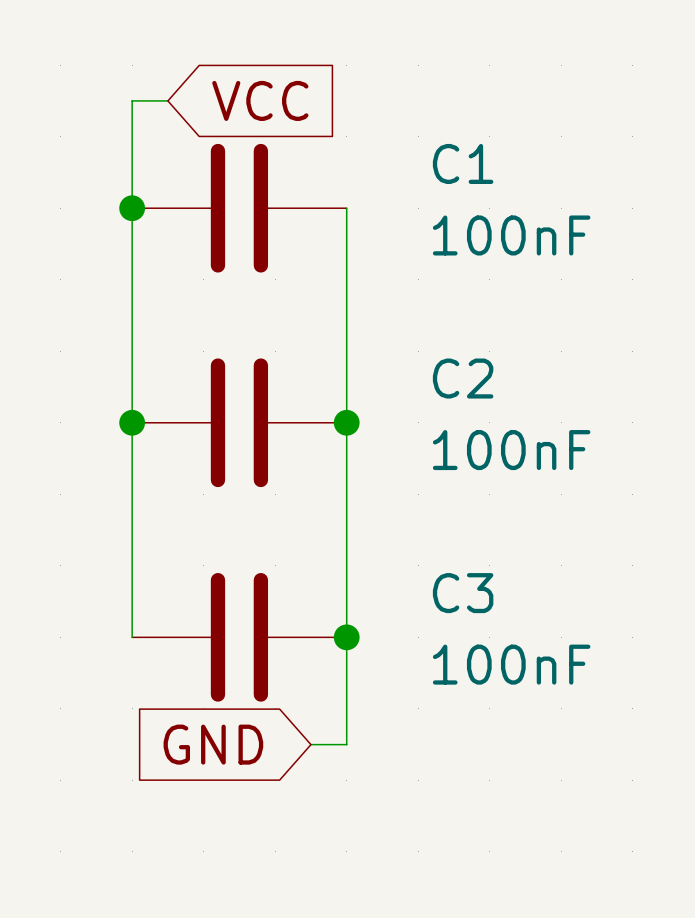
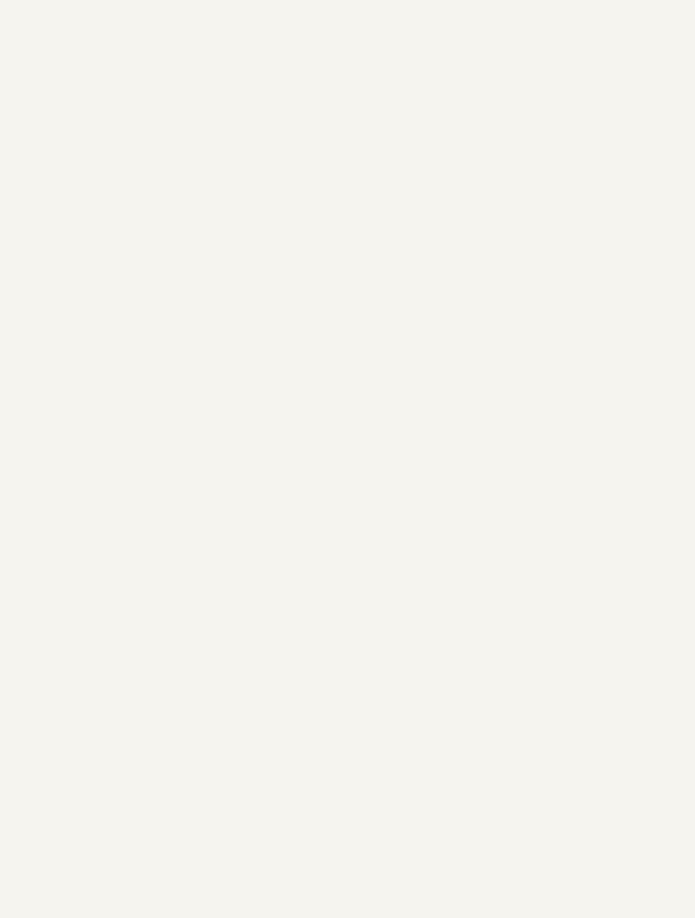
wire: (167, 100) (132, 100) (132, 637) -> none
global label: VCC (260, 100) -> none
junction: (132, 208) -> none
C1: 100nF (239, 208) -> none
wire: (346, 208) (346, 744) (310, 744) -> none
junction: (132, 422) -> none
C2: 100nF (239, 422) -> none
junction: (346, 422) -> none
C3: 100nF (239, 637) -> none
junction: (346, 637) -> none
global label: GND (213, 744) -> none

